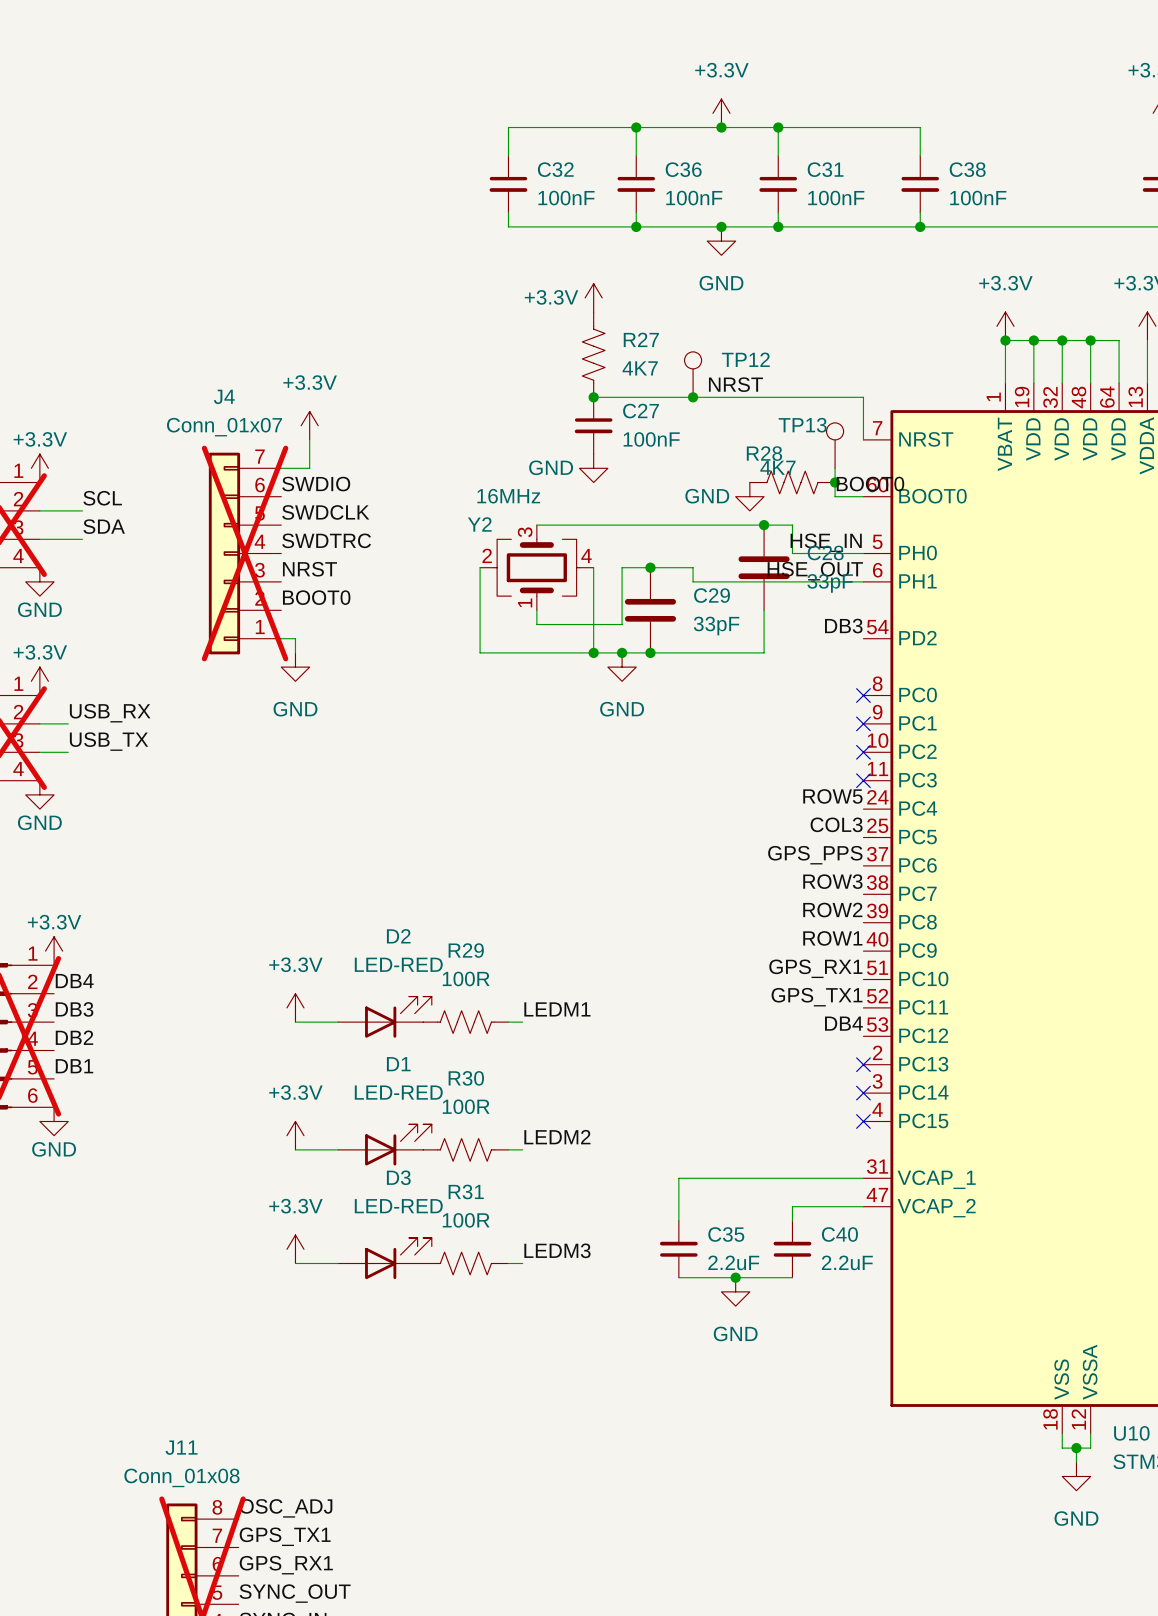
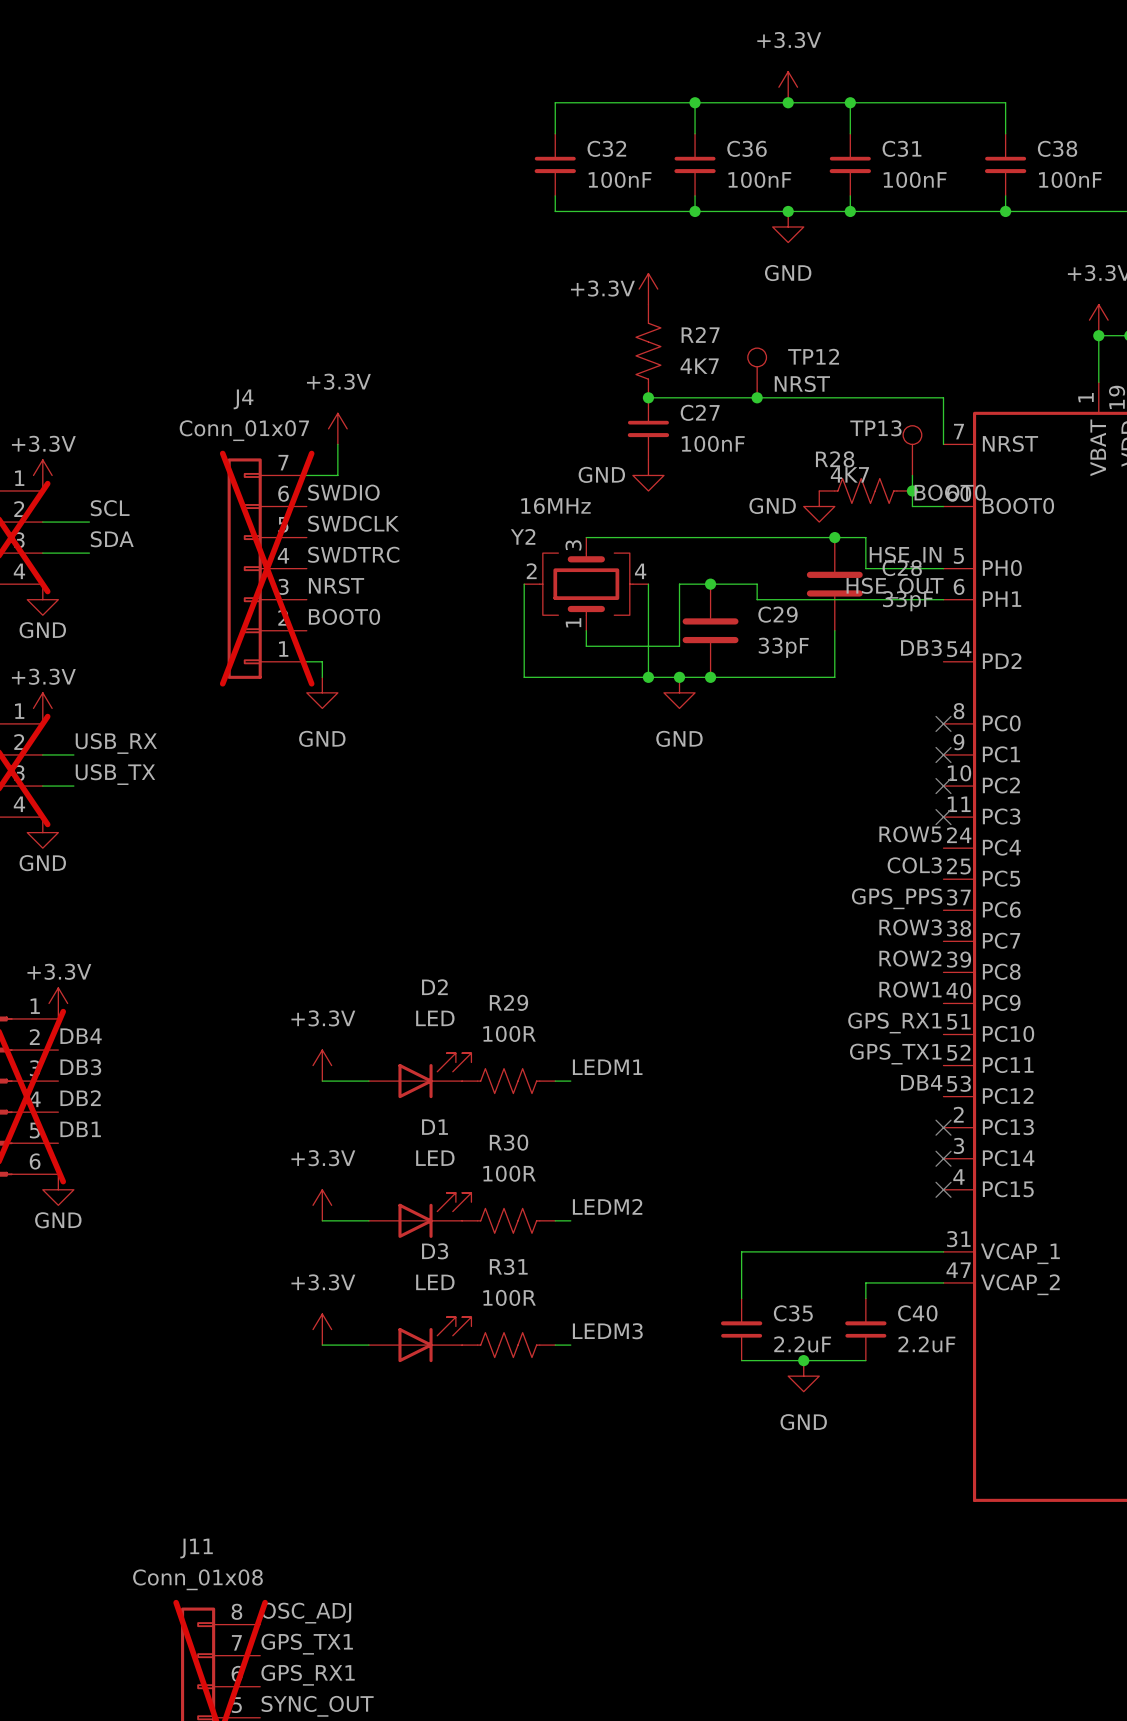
D2 value: LED-RED (398, 964) -> LED (435, 1018)
D1 value: LED-RED (398, 1092) -> LED (435, 1158)
D3 value: LED-RED (398, 1206) -> LED (435, 1282)

